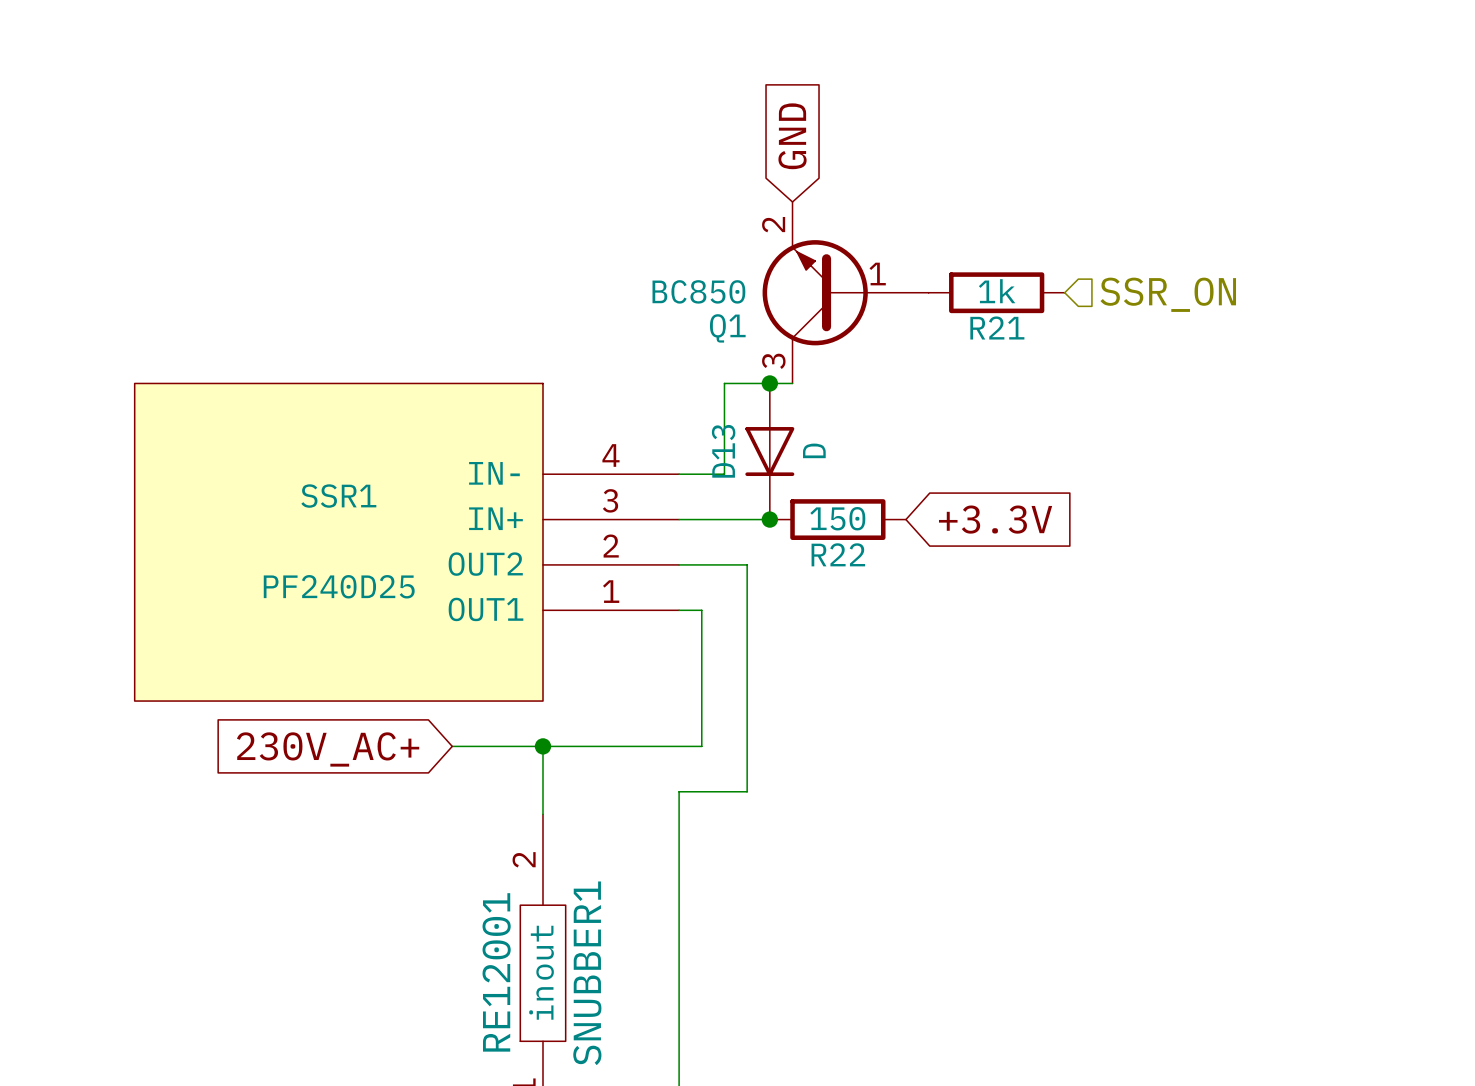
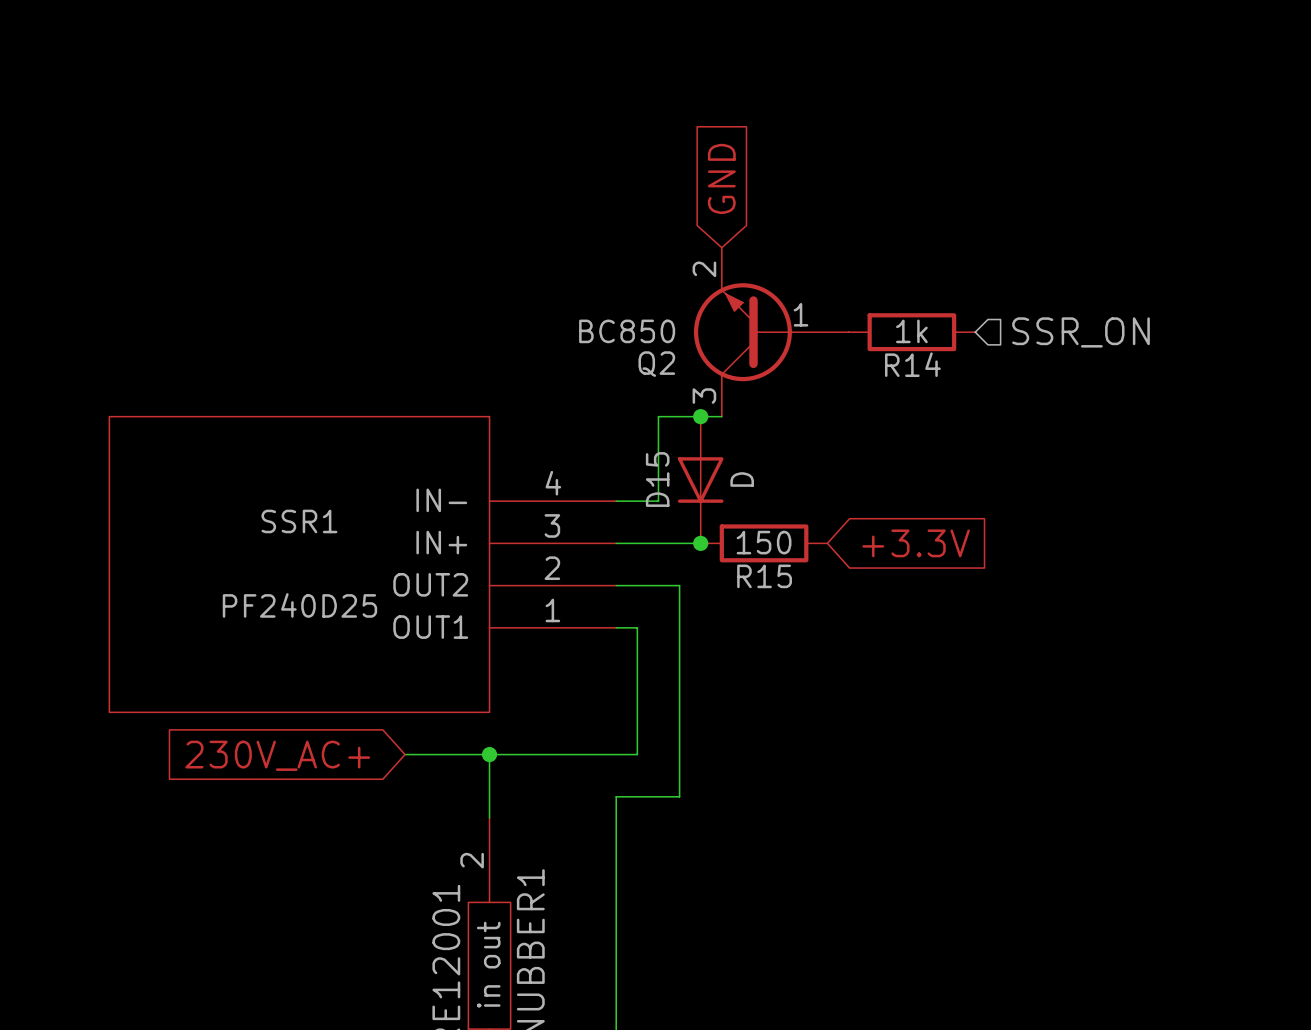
R21 name: R21 (997, 327) -> R14 (912, 364)
Q1 name: Q1 (727, 328) -> Q2 (656, 364)
D13 name: D13 (723, 451) -> D15 (657, 479)
R22 name: R22 (838, 554) -> R15 (764, 576)

